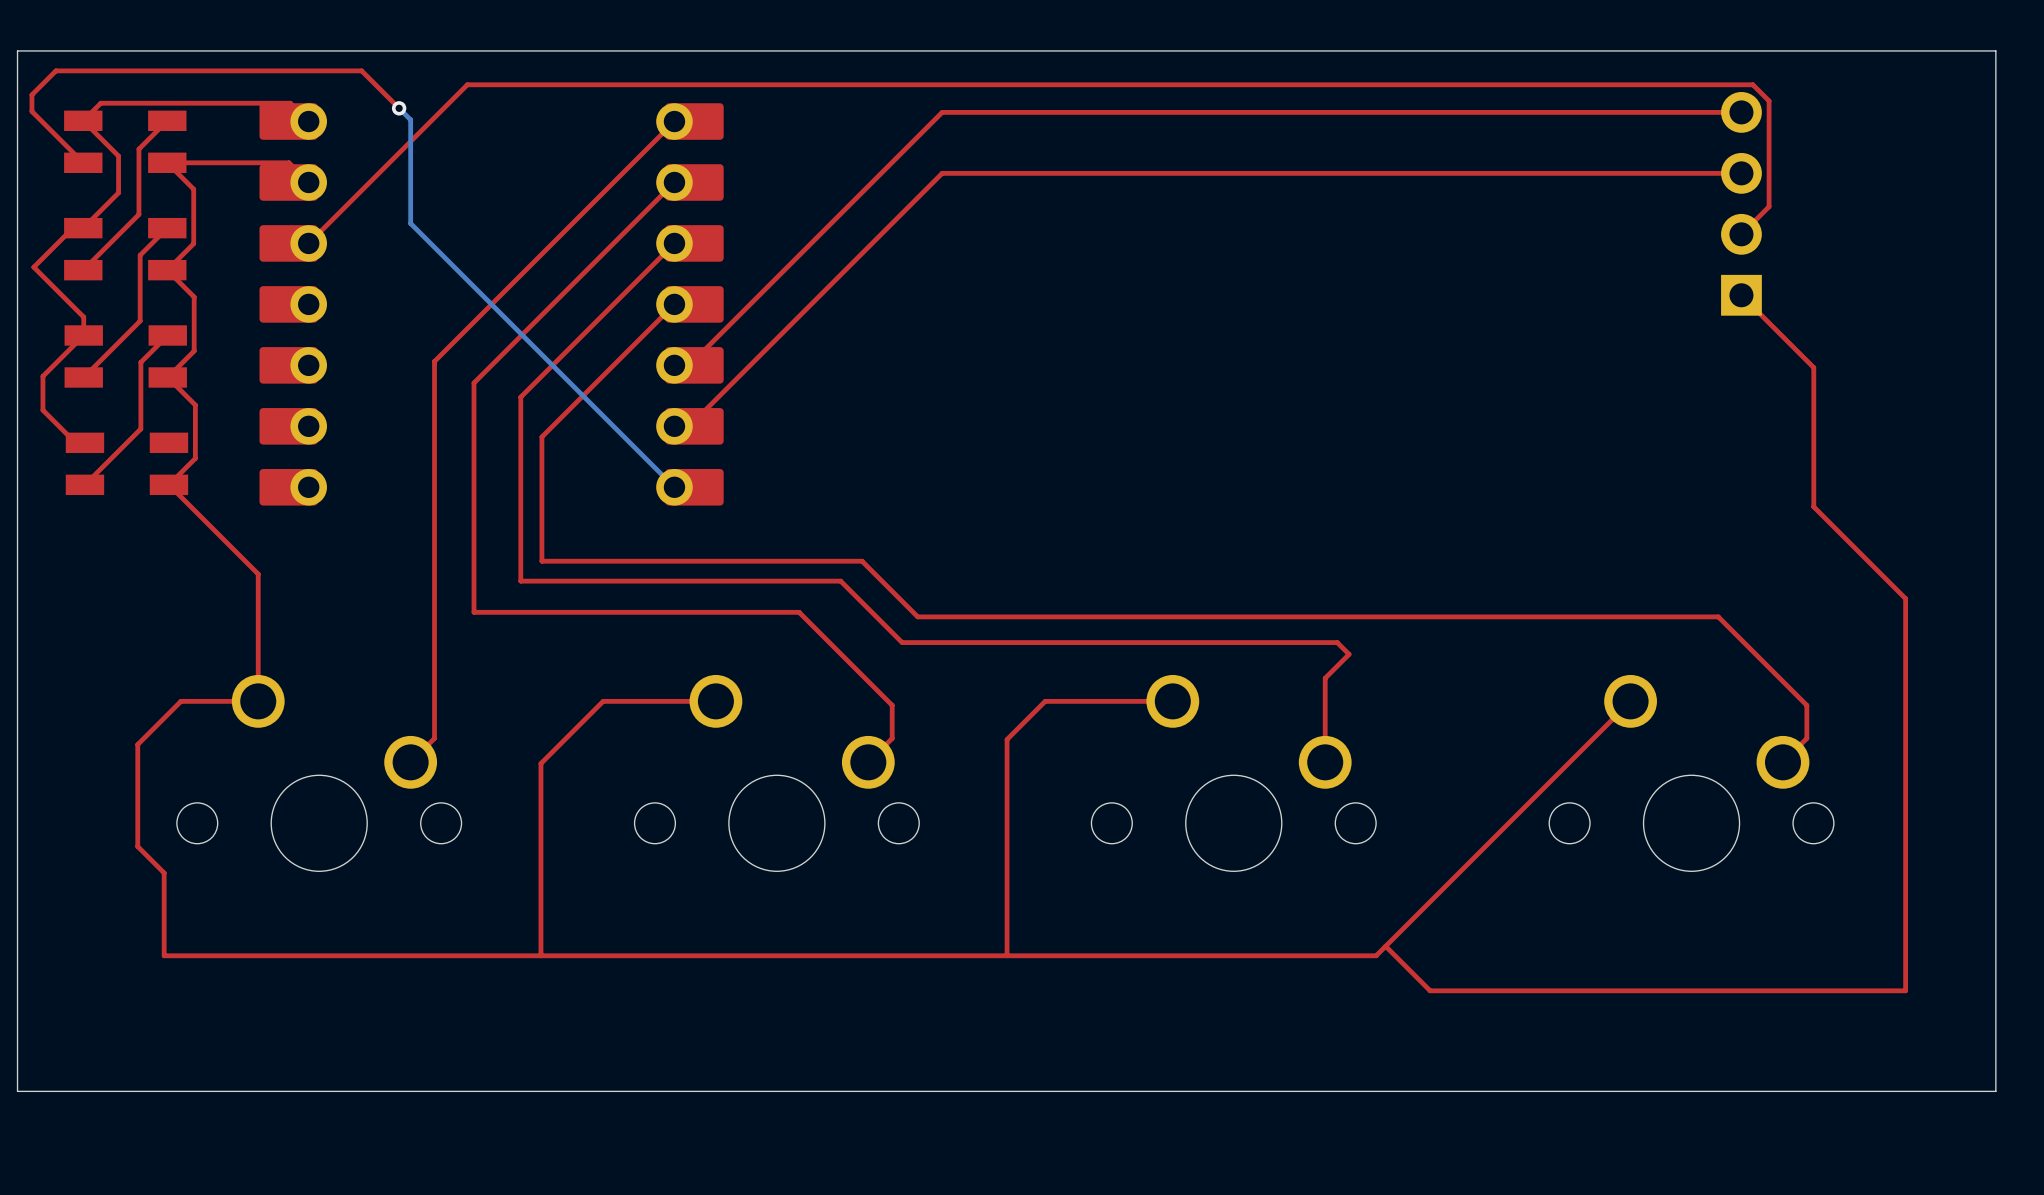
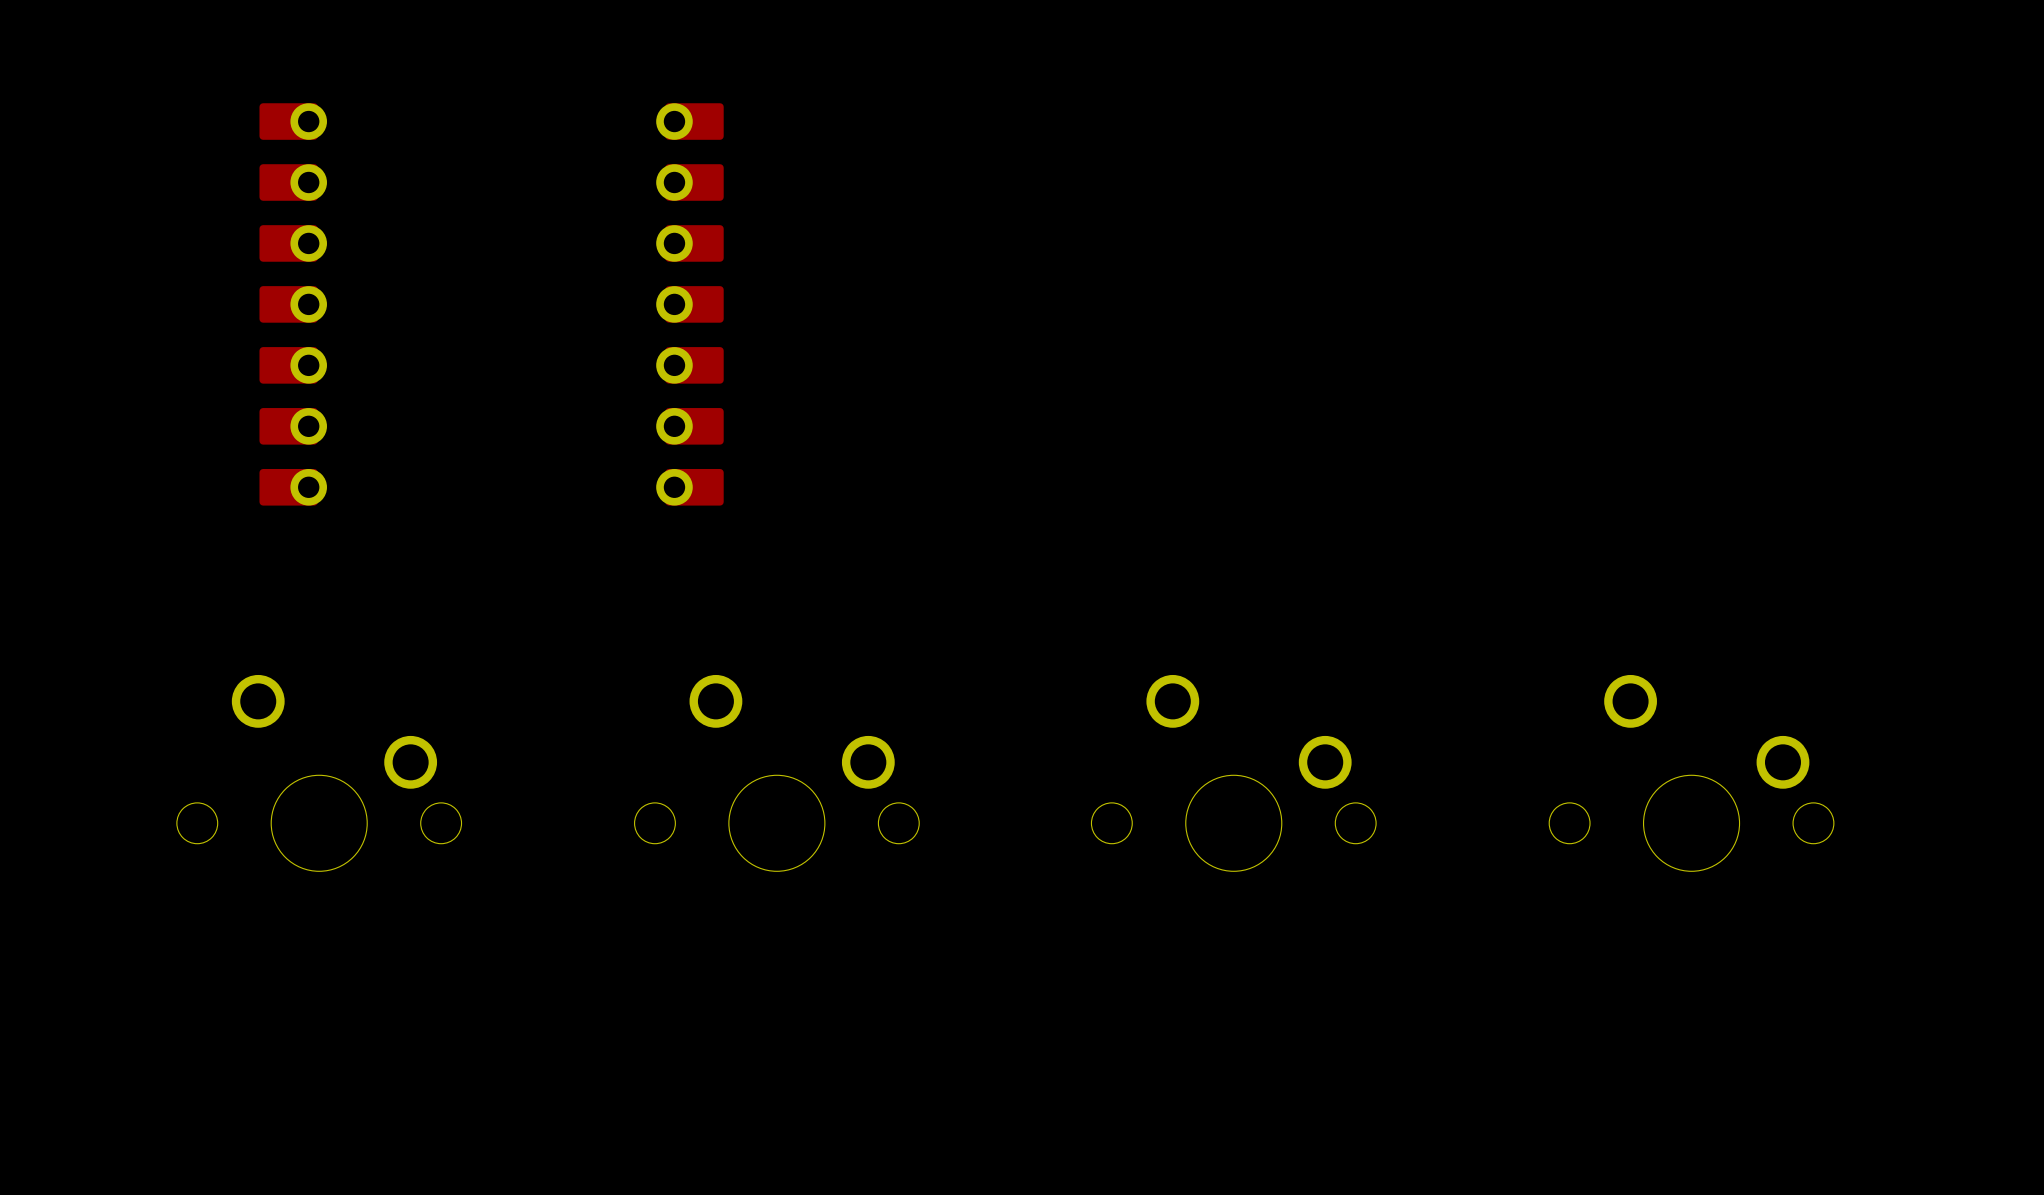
board edge: (1995, 50) (17, 50) (17, 1091) (1995, 1091) (1995, 50) -> none
top track: (399, 108) (361, 70) (55, 70) (31, 94) (31, 111) (83, 162) -> none
bottom track: (399, 108) (410, 119) (410, 223) (674, 487) -> none
via: (399, 108) -> none
top track: (1741, 112) (942, 112) (689, 365) (674, 365) -> none
top track: (167, 120) (138, 149) (138, 214) (83, 270) -> none
top track: (308, 121) (290, 103) (100, 103) (83, 120) (118, 156) (118, 192) (83, 228) (72, 228) (33, 267) (83, 317) (83, 335) (42, 376) (42, 410) (75, 442) (84, 442) -> none
top track: (674, 121) (434, 361) (434, 738) (410, 762) -> none
part: (125, 141) -> none
top track: (1741, 173) (942, 173) (689, 426) (674, 426) -> none
top track: (282, 182) (308, 182) (289, 162) (167, 162) (193, 189) (193, 243) (167, 270) (194, 297) (194, 351) (167, 377) (195, 405) (195, 458) (168, 484) (258, 574) (258, 701) (180, 701) (137, 744) (137, 846) (164, 872) (164, 955) (1376, 955) (1630, 701) -> none
top track: (674, 182) (474, 382) (474, 612) (799, 612) (892, 705) (892, 738) (868, 762) -> none
part: (1741, 203) -> none
top track: (167, 228) (140, 255) (140, 321) (83, 377) -> none
top track: (1741, 234) (1769, 206) (1769, 100) (1752, 84) (467, 84) (308, 243) -> none
top track: (674, 243) (520, 397) (520, 581) (840, 581) (902, 642) (1337, 642) (1349, 654) (1325, 678) (1325, 762) -> none
part: (125, 249) -> none
top track: (1741, 295) (1813, 367) (1813, 506) (1905, 598) (1905, 990) (1430, 990) (1385, 946) -> none
top track: (674, 304) (541, 436) (541, 561) (862, 561) (917, 616) (1718, 616) (1806, 705) (1806, 738) (1782, 762) -> none
top track: (167, 335) (140, 362) (140, 428) (84, 484) -> none
part: (125, 356) -> none
part: (126, 463) -> none
top track: (715, 701) (603, 701) (540, 763) (540, 955) -> none
top track: (1172, 701) (1045, 701) (1007, 739) (1007, 955) -> none

